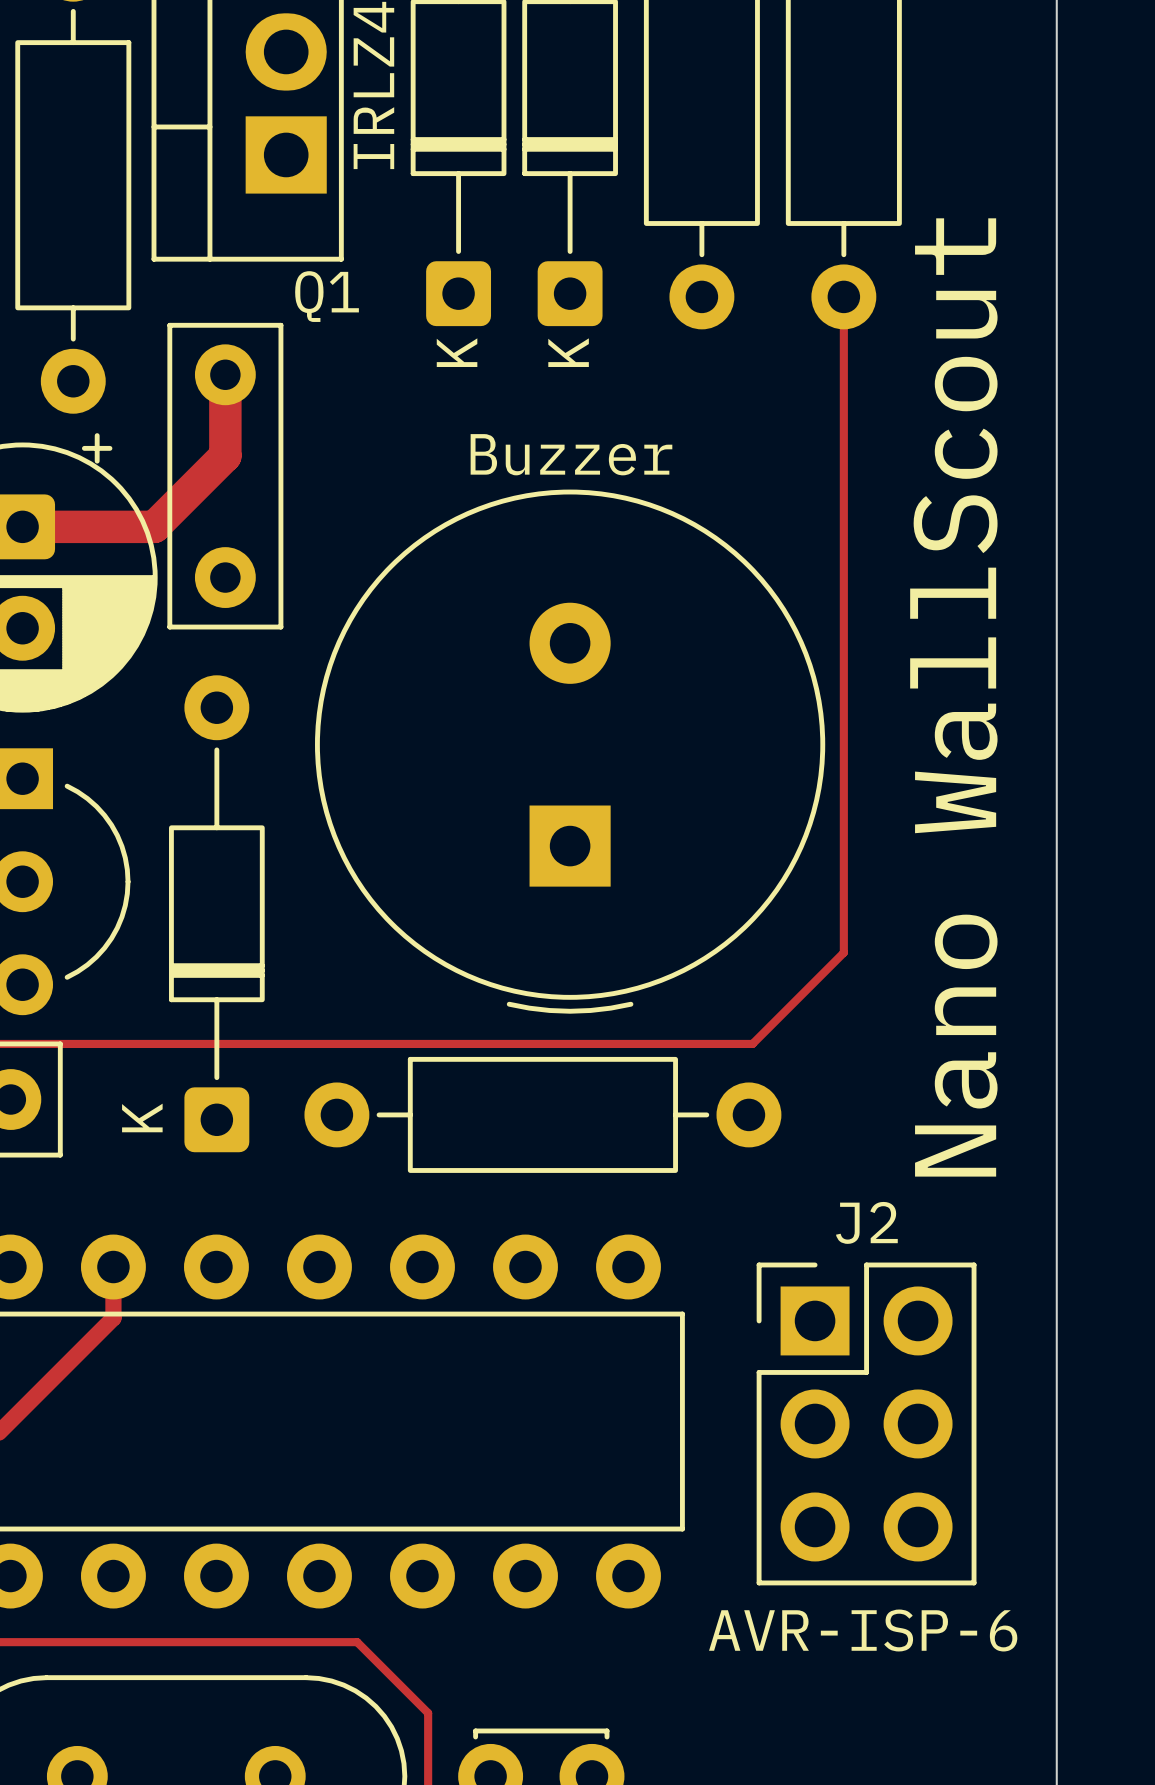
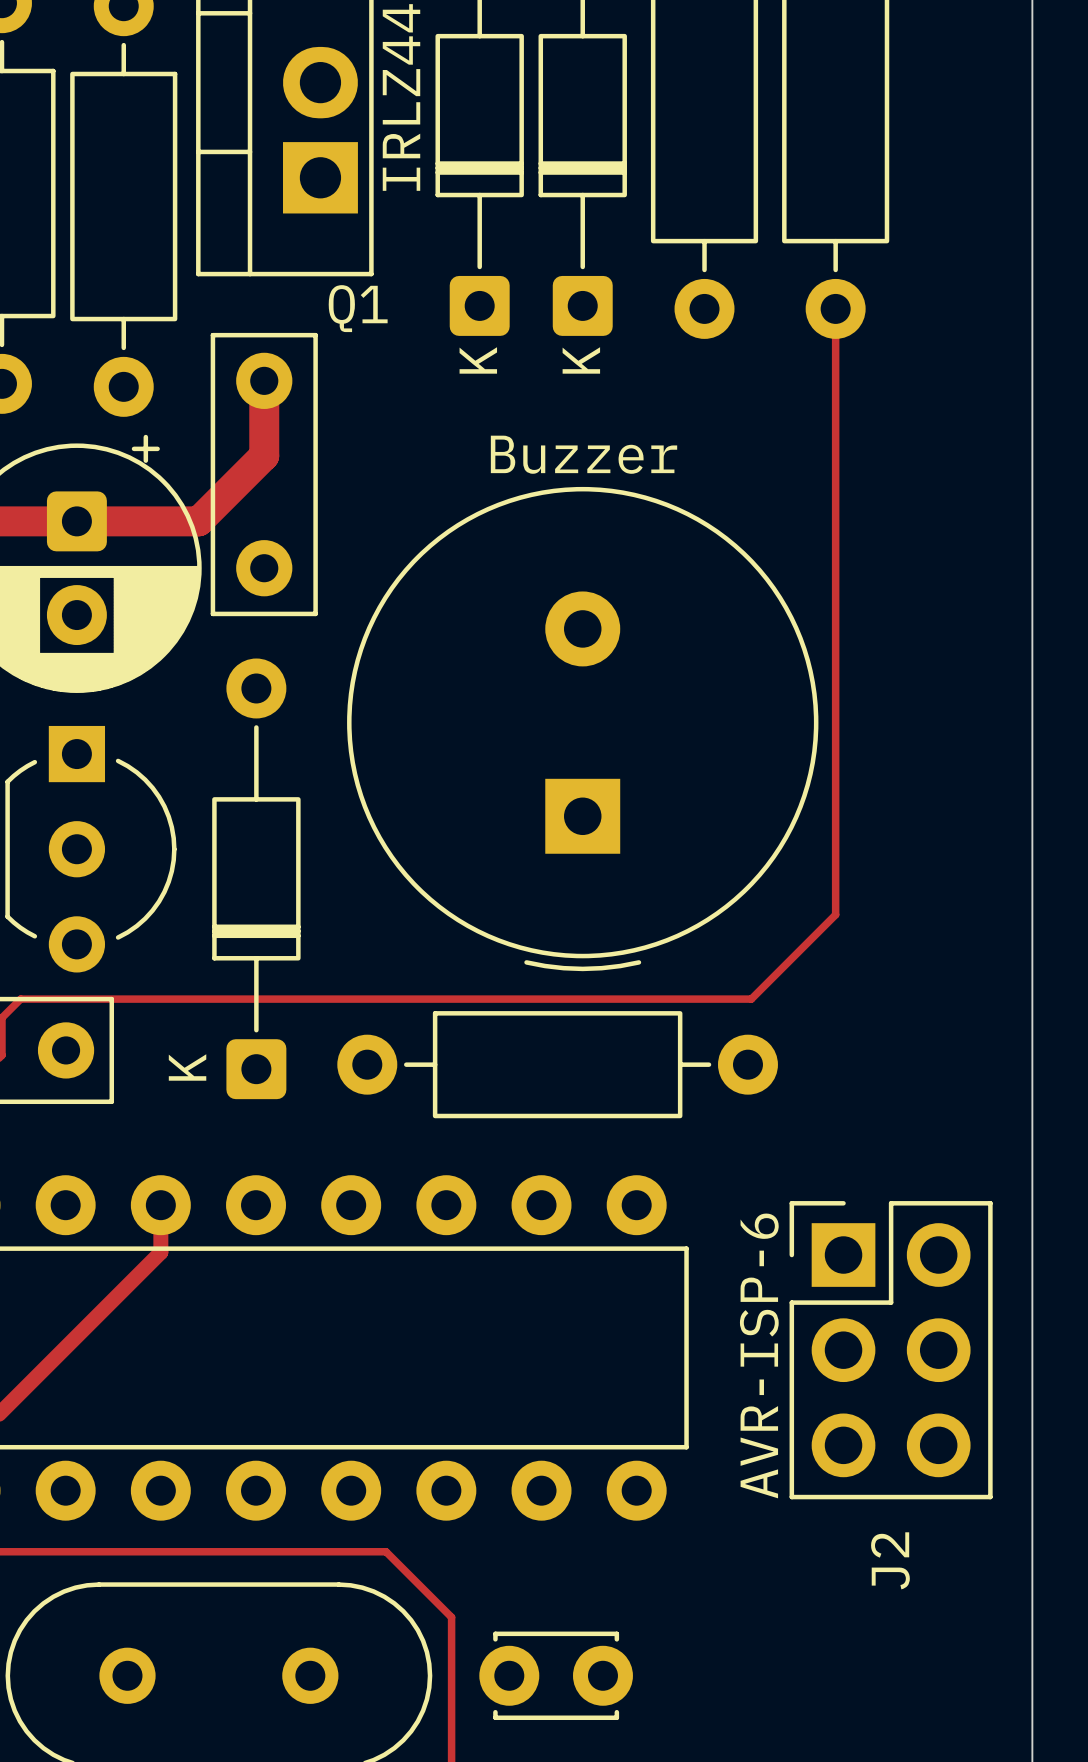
text: Nano WallScout (953, 697) -> none
J2 name rotation: 0° (866, 1222) -> 90° counterclockwise (890, 1560)
J2 name position: J2 (866, 1222) -> J2 (890, 1560)
J2 position: (866, 1423) -> (891, 1350)
J2 value rotation: 0° (863, 1630) -> 90° counterclockwise (759, 1355)

